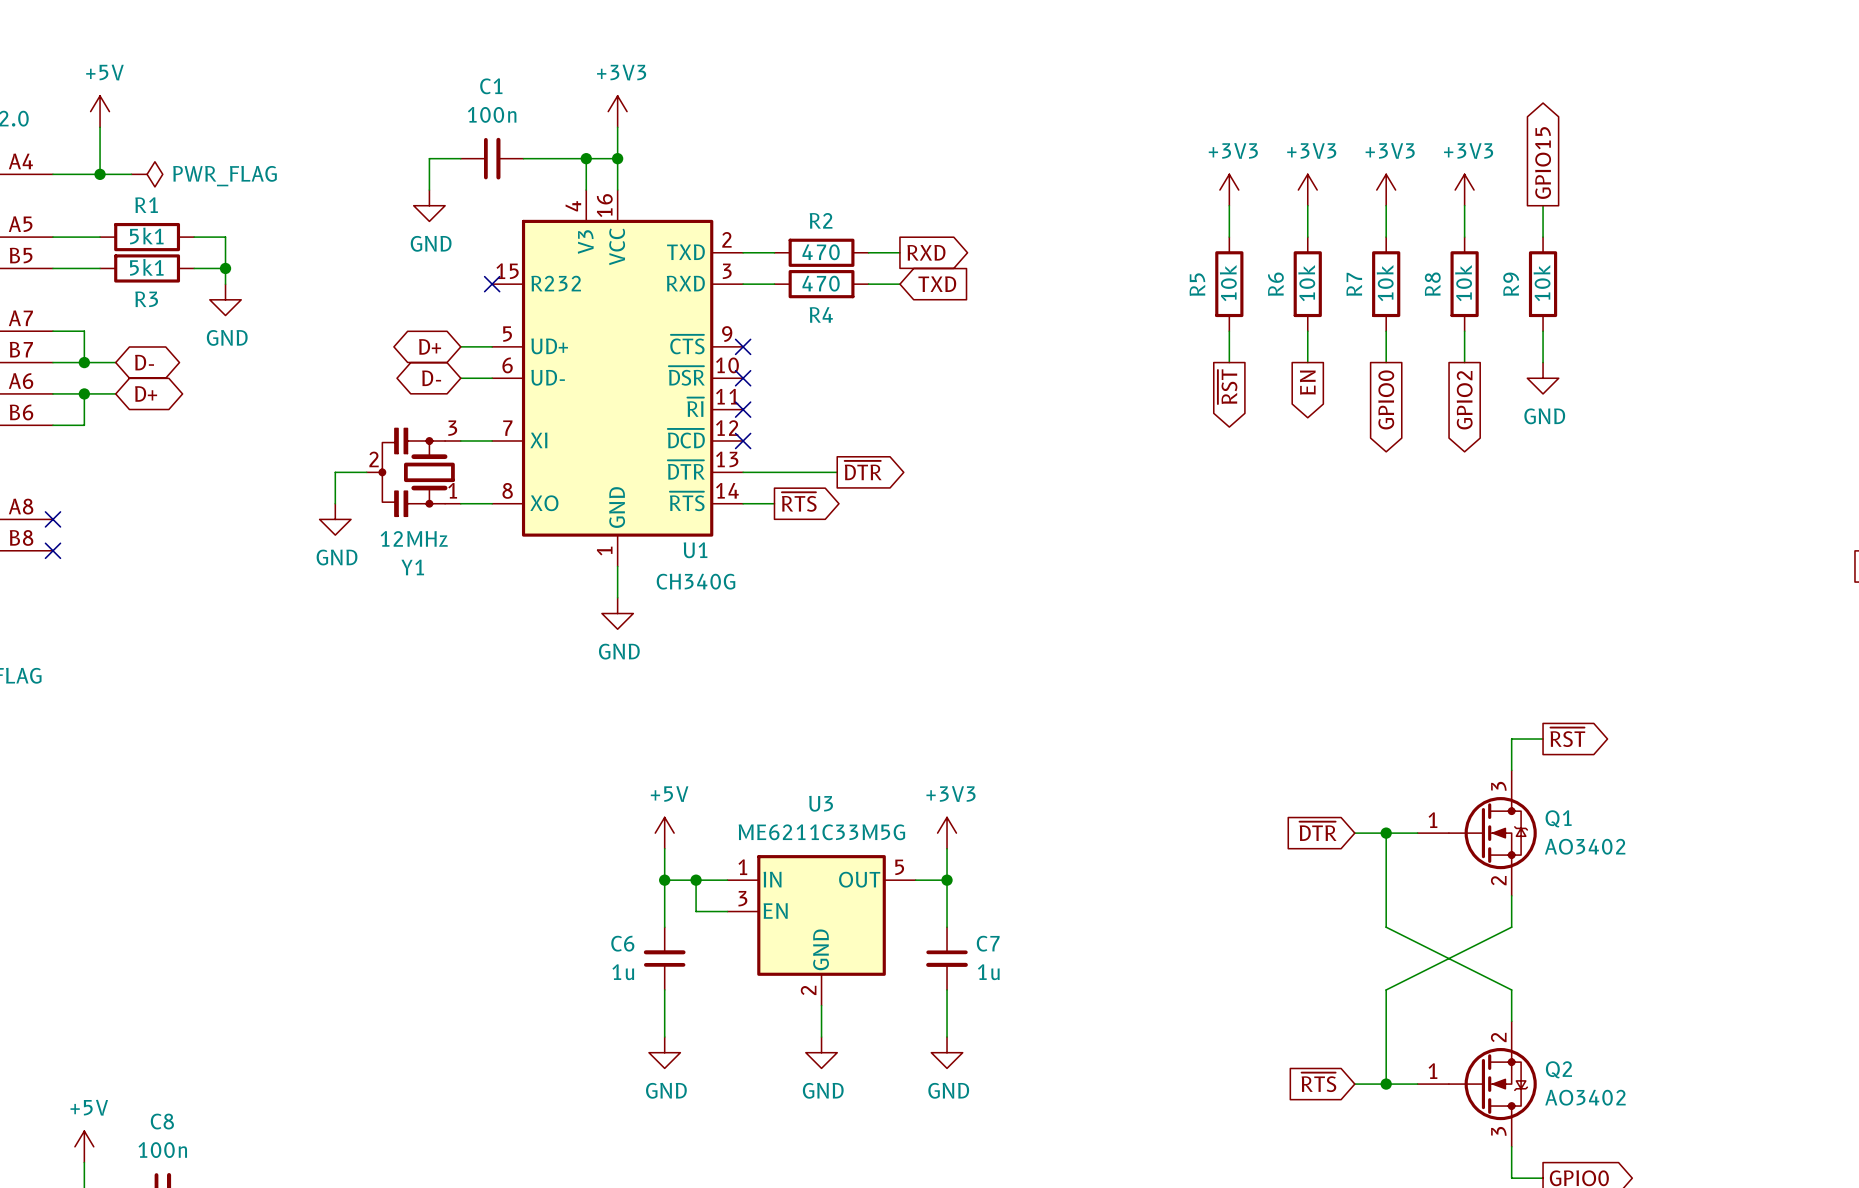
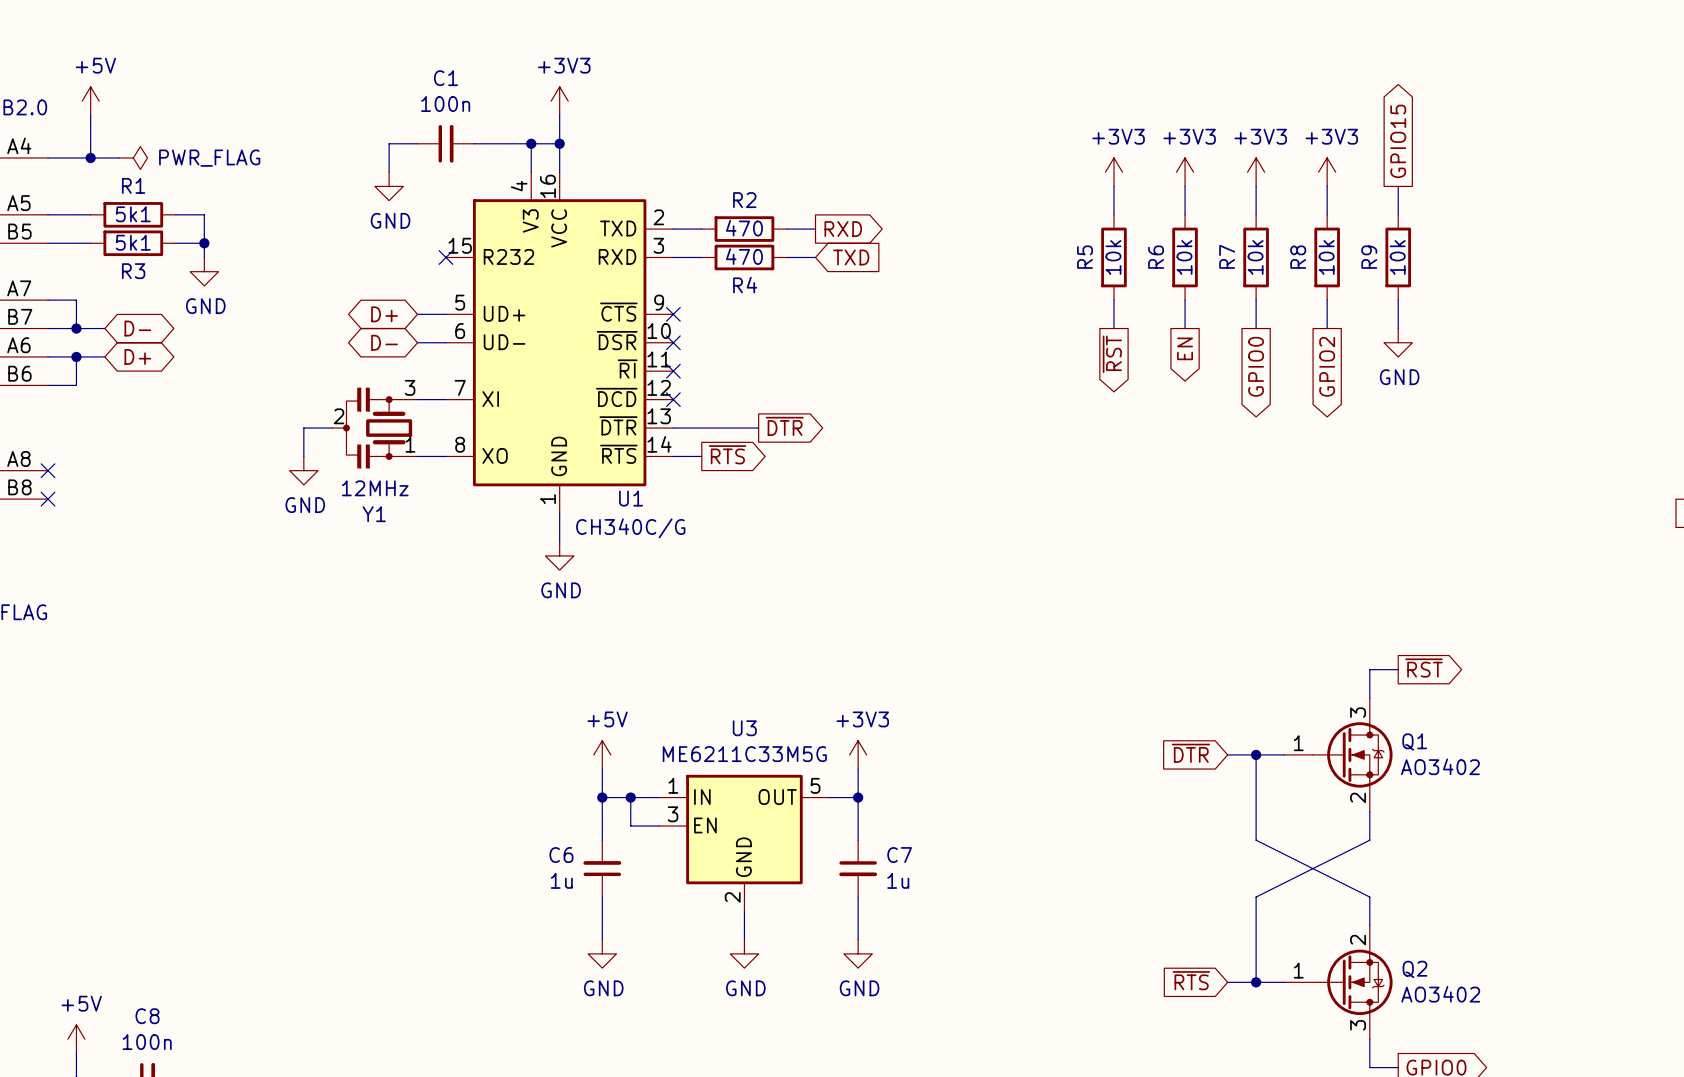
U1 value: CH340G (696, 581) -> CH340C/G (630, 528)

